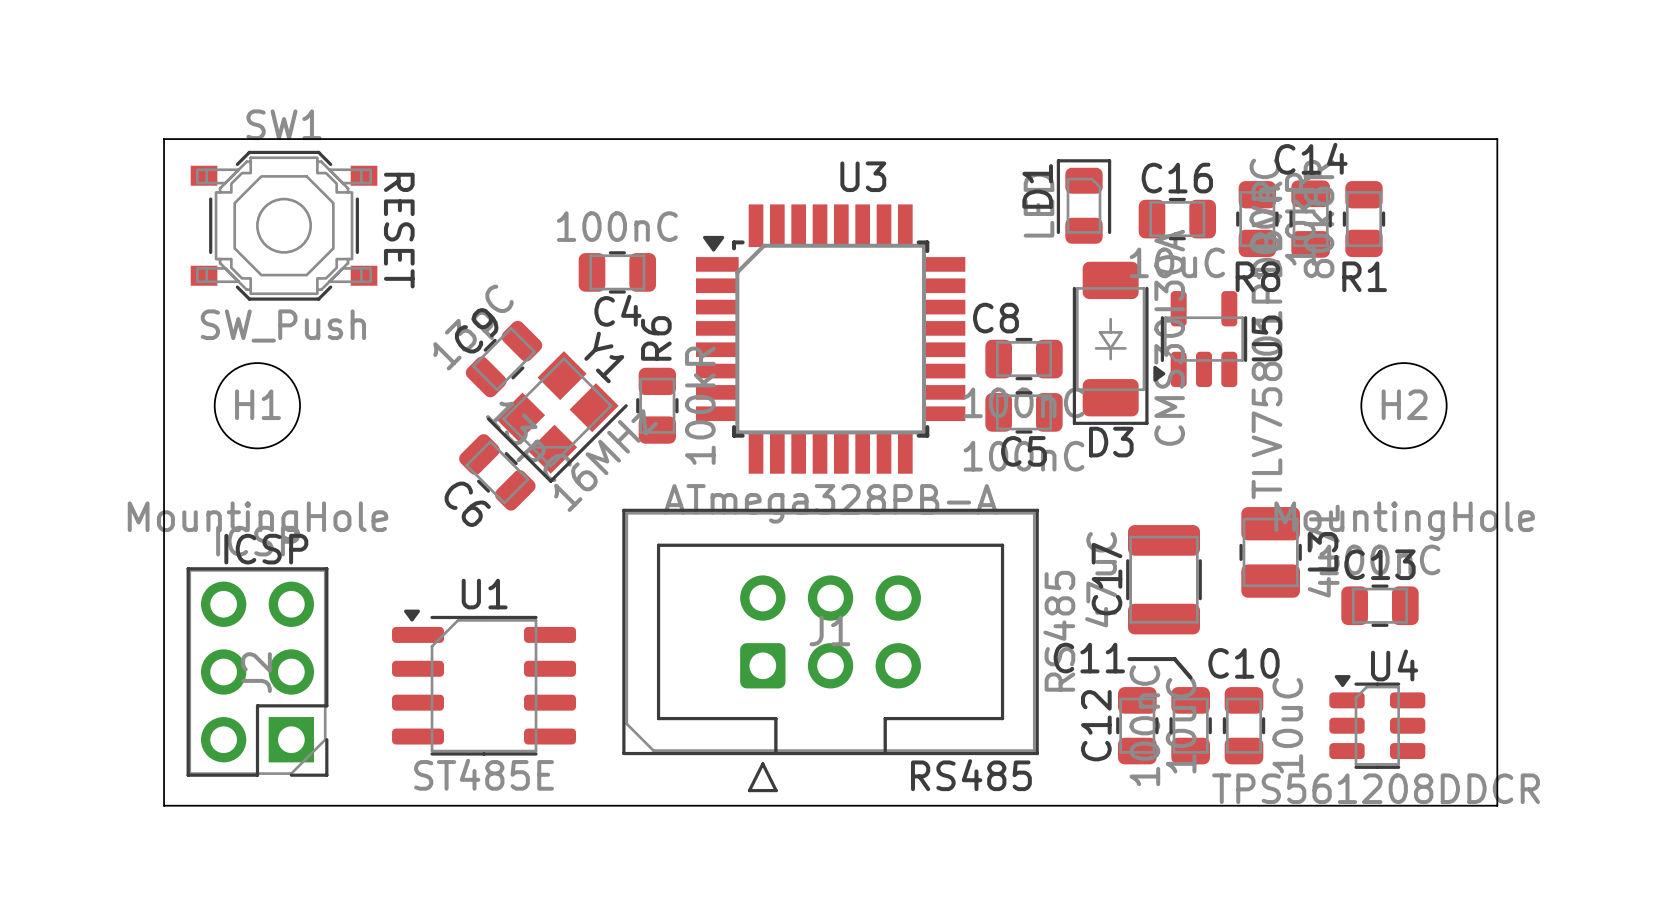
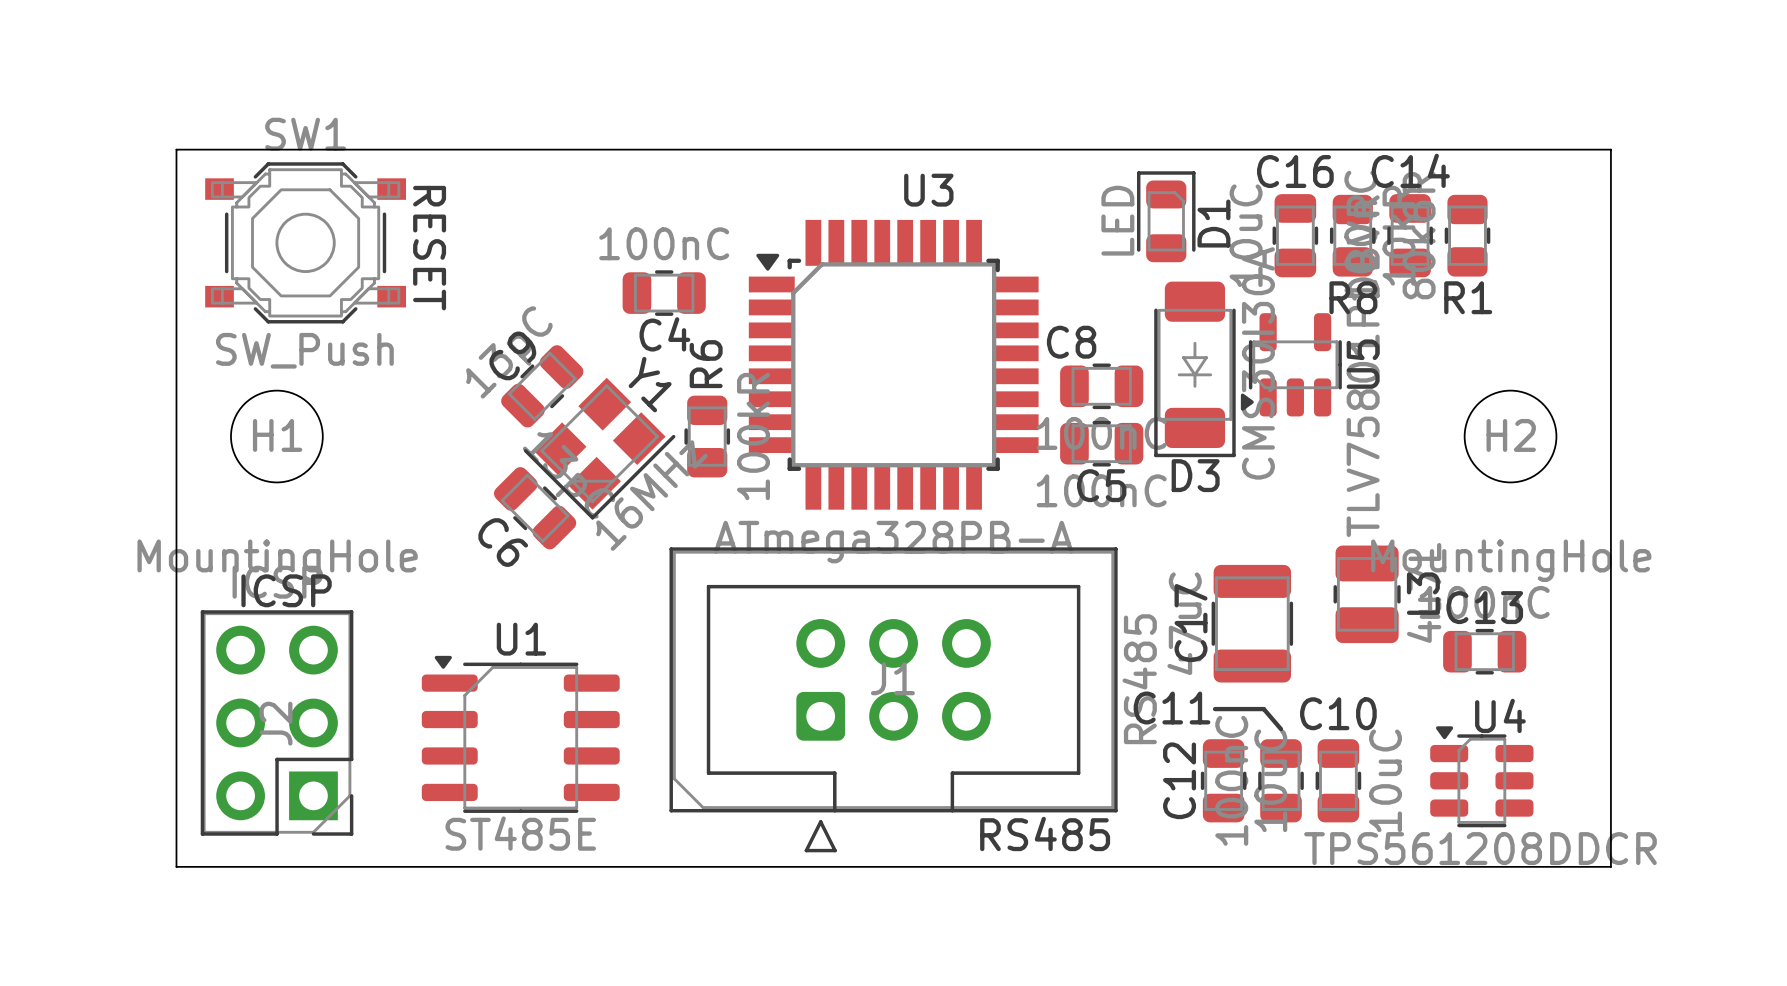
D1 name position: D1 (1037, 186) -> D1 (1213, 223)
C16 rotation: 0° (1177, 219) -> 90° clockwise (1295, 235)

